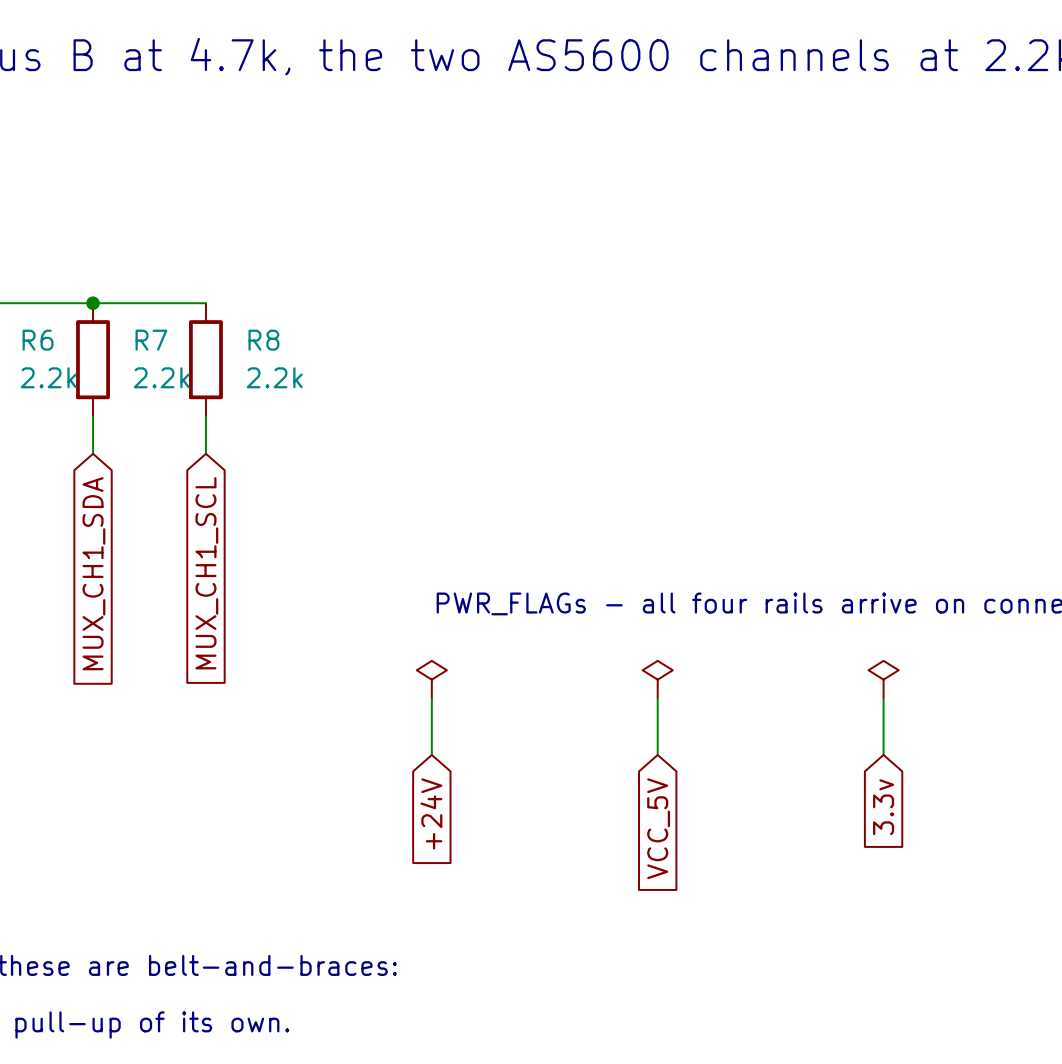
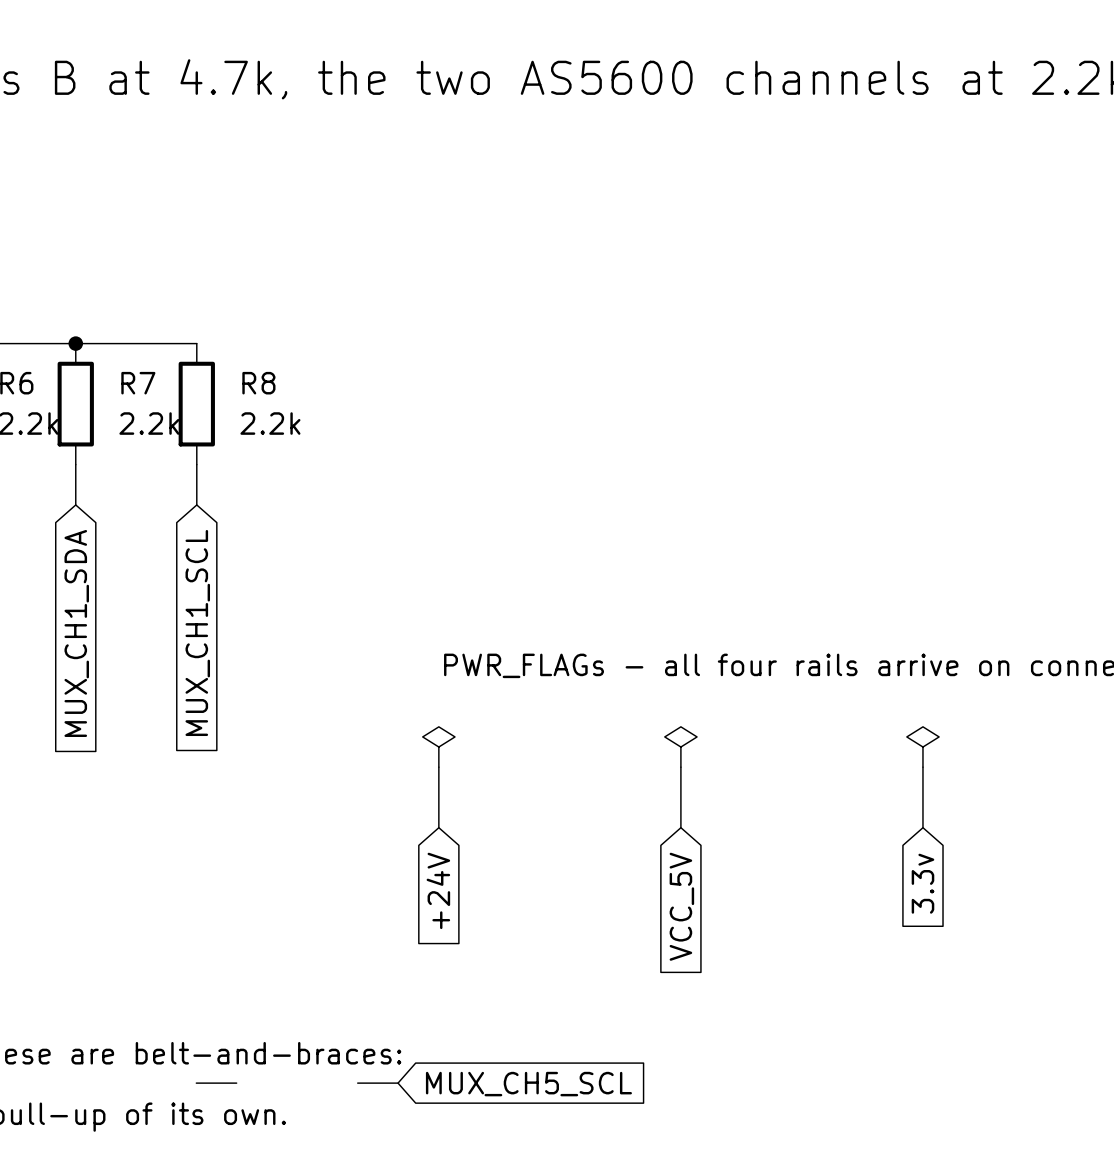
wire: none -> (196, 1083) (236, 1083)
wire: none -> (357, 1083) (398, 1083)
global label: none -> MUX_CH5_SCL (528, 1084)

